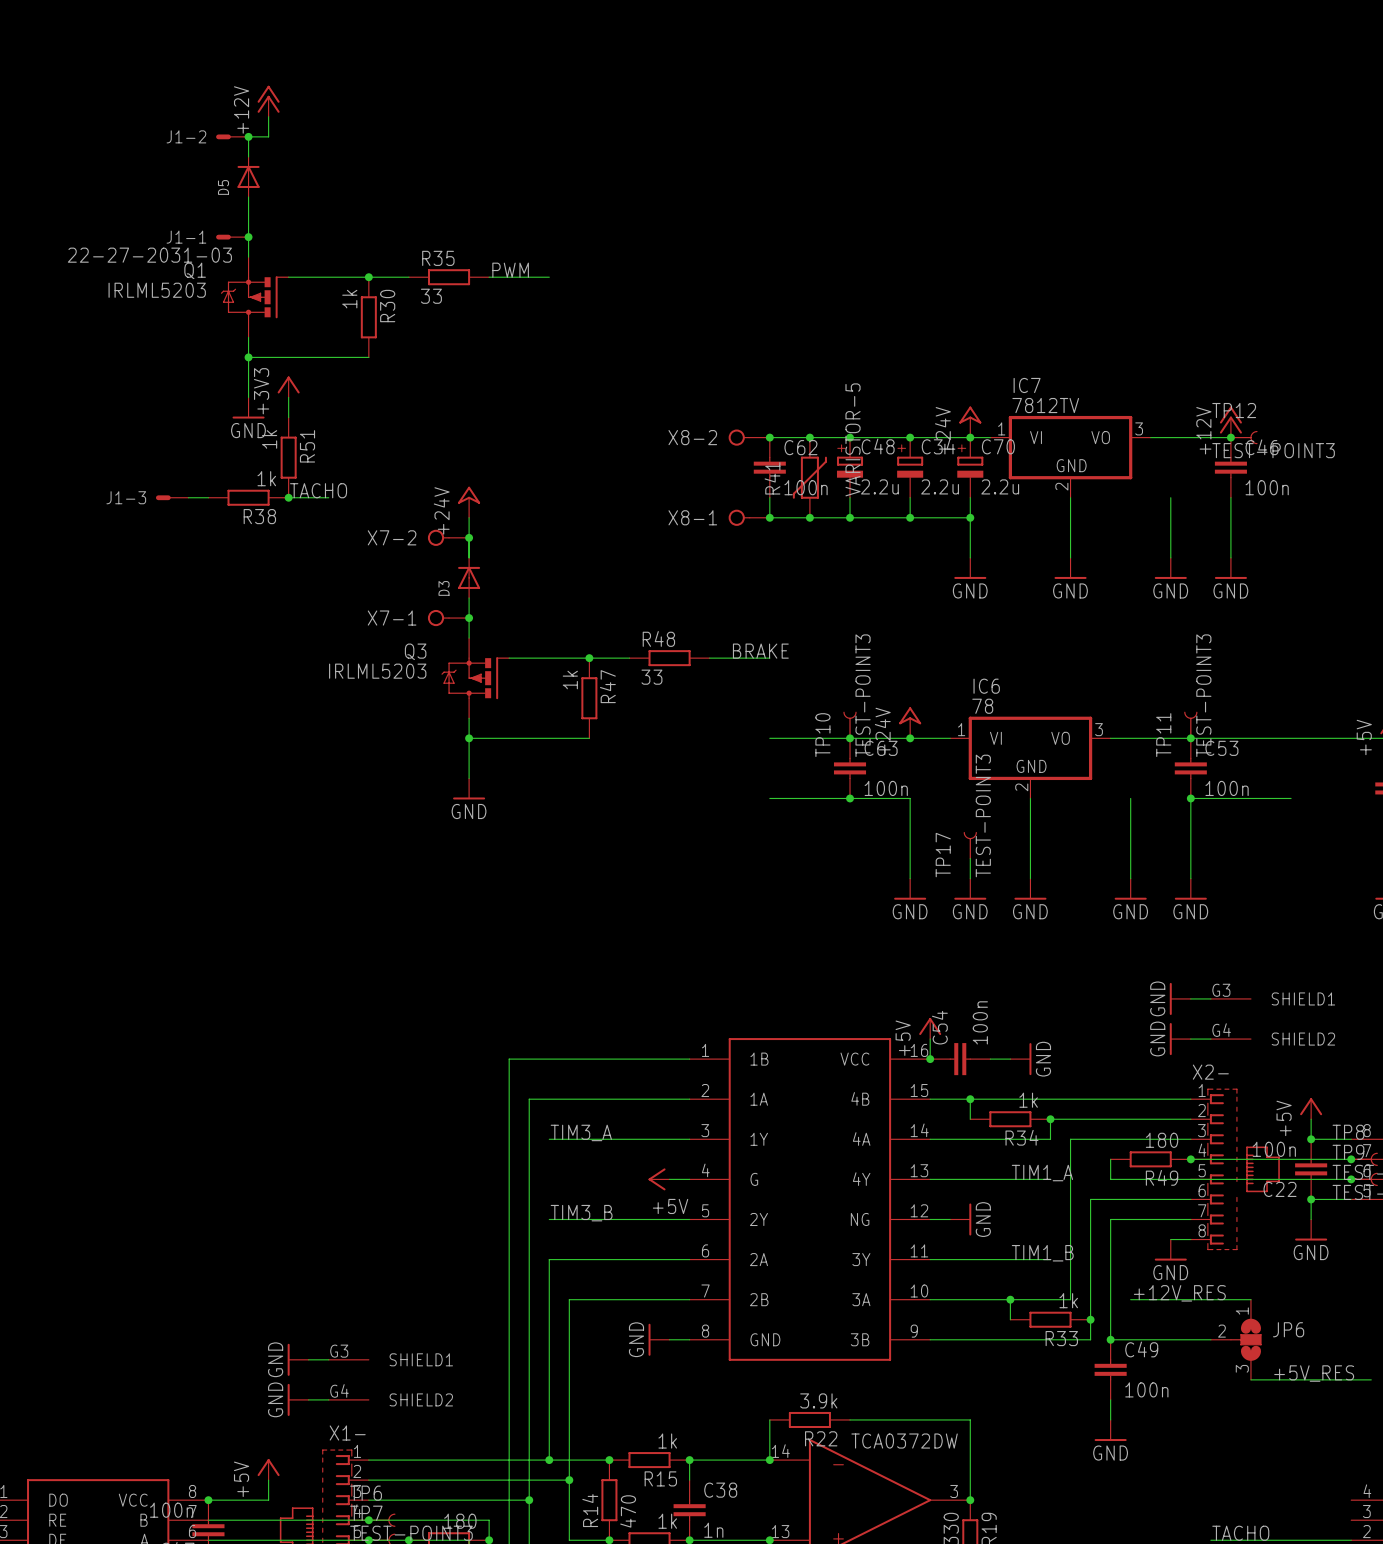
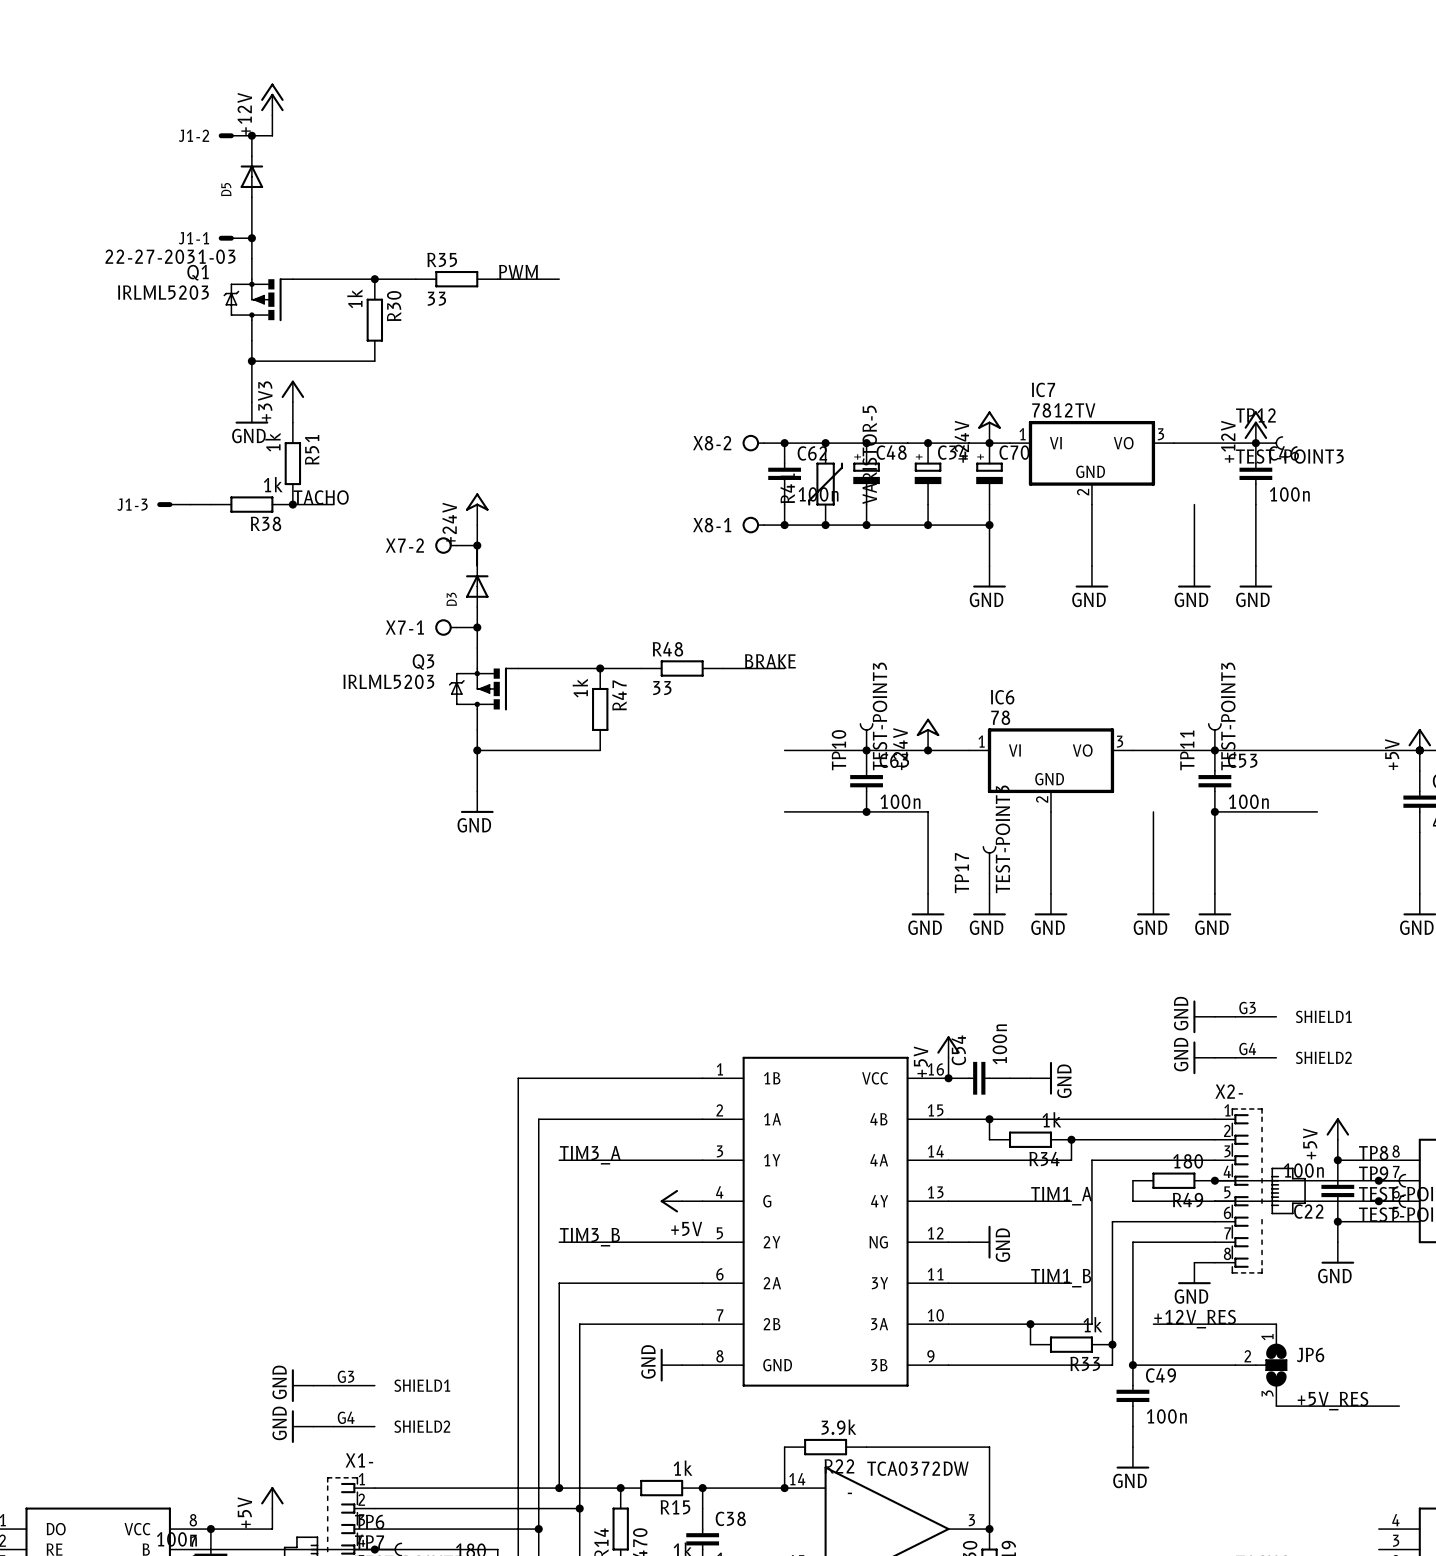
C48 value: 2.2u (879, 486) -> none
C34 value: 2.2u (940, 486) -> none
C70 value: 2.2u (1000, 486) -> none

